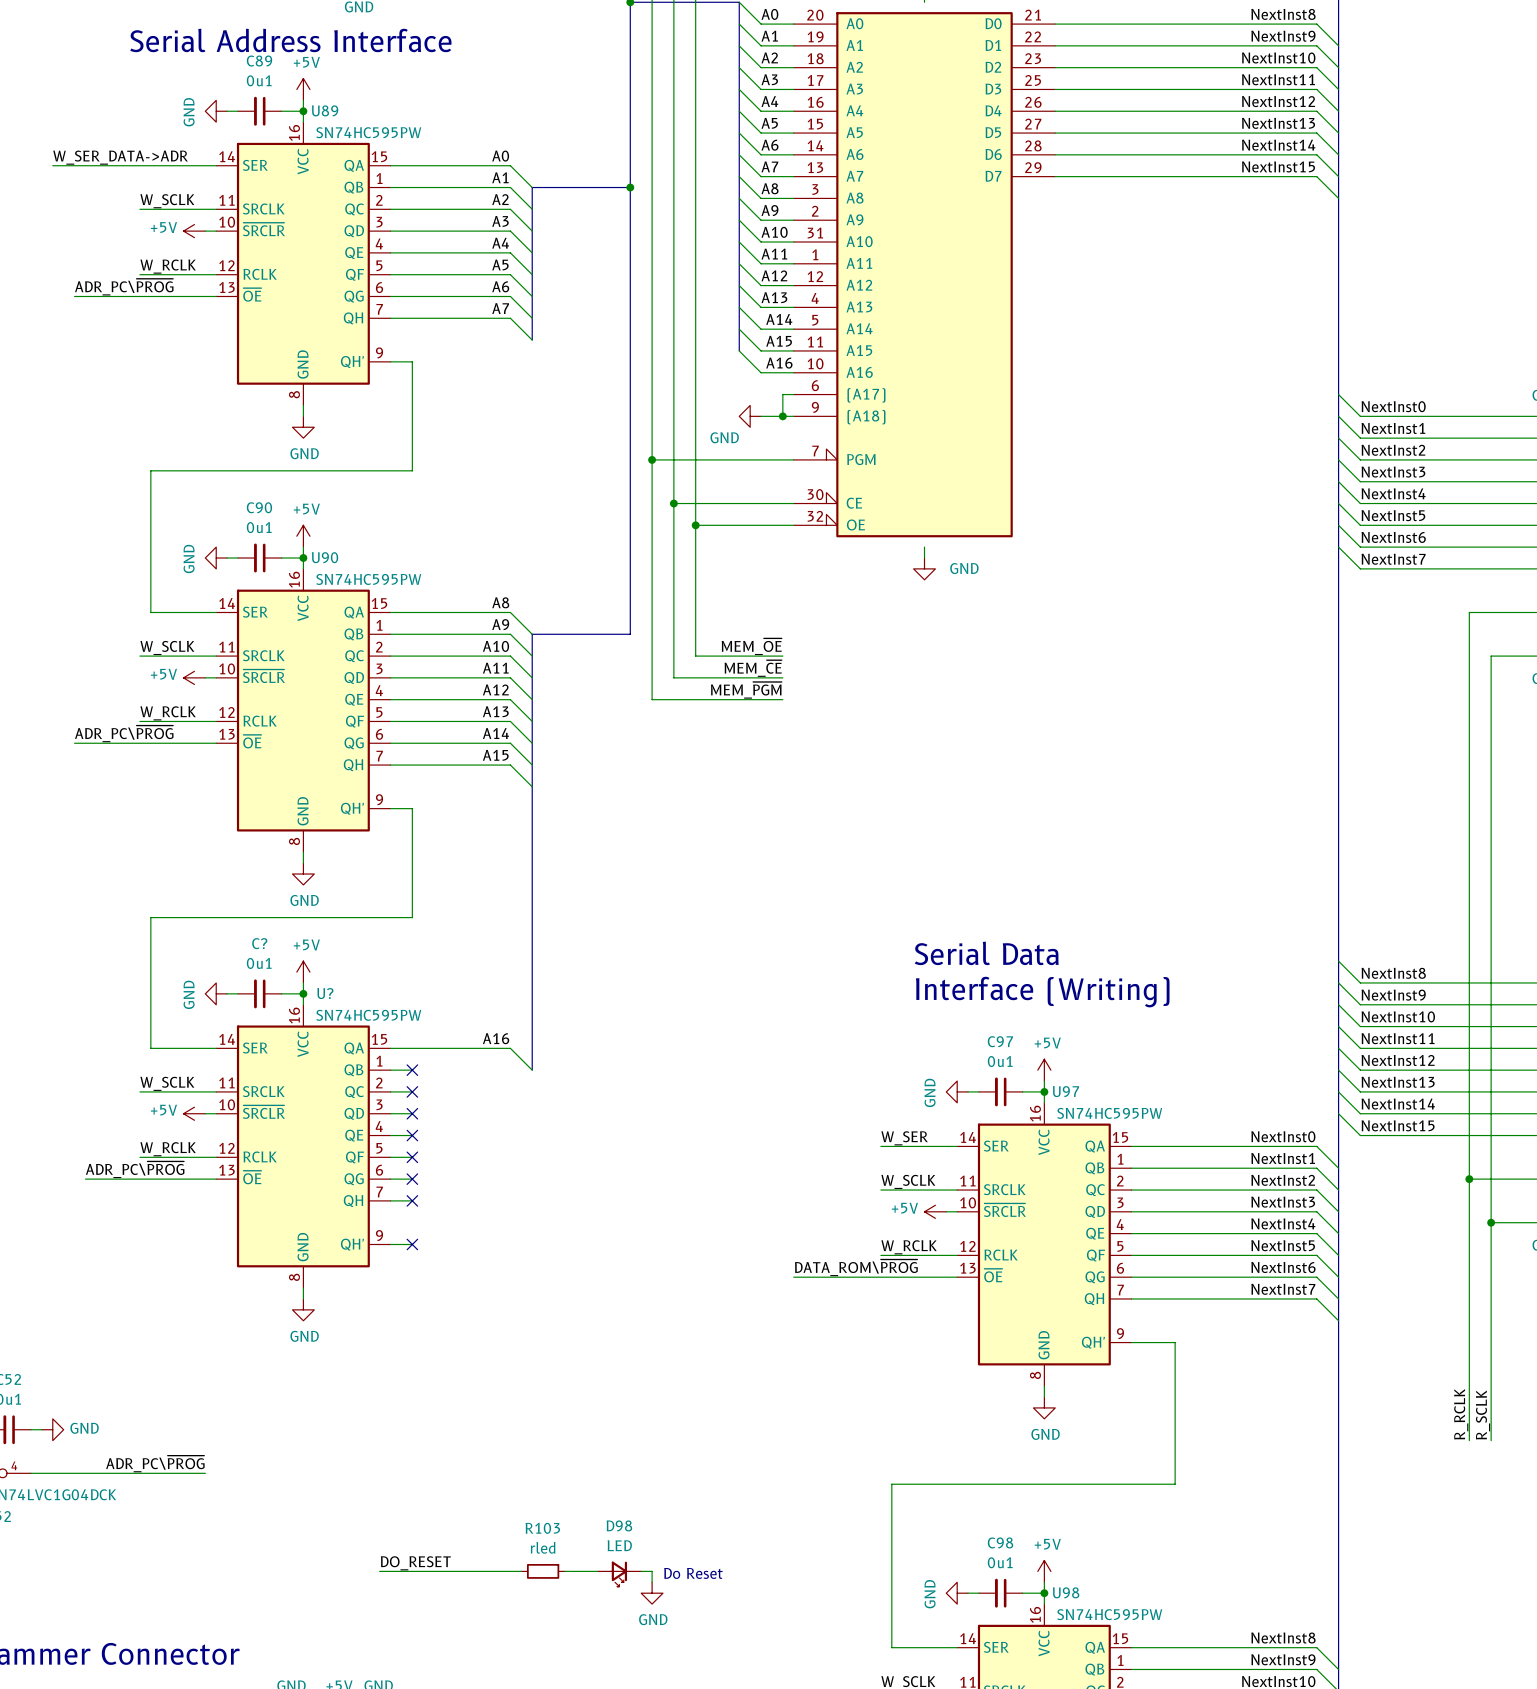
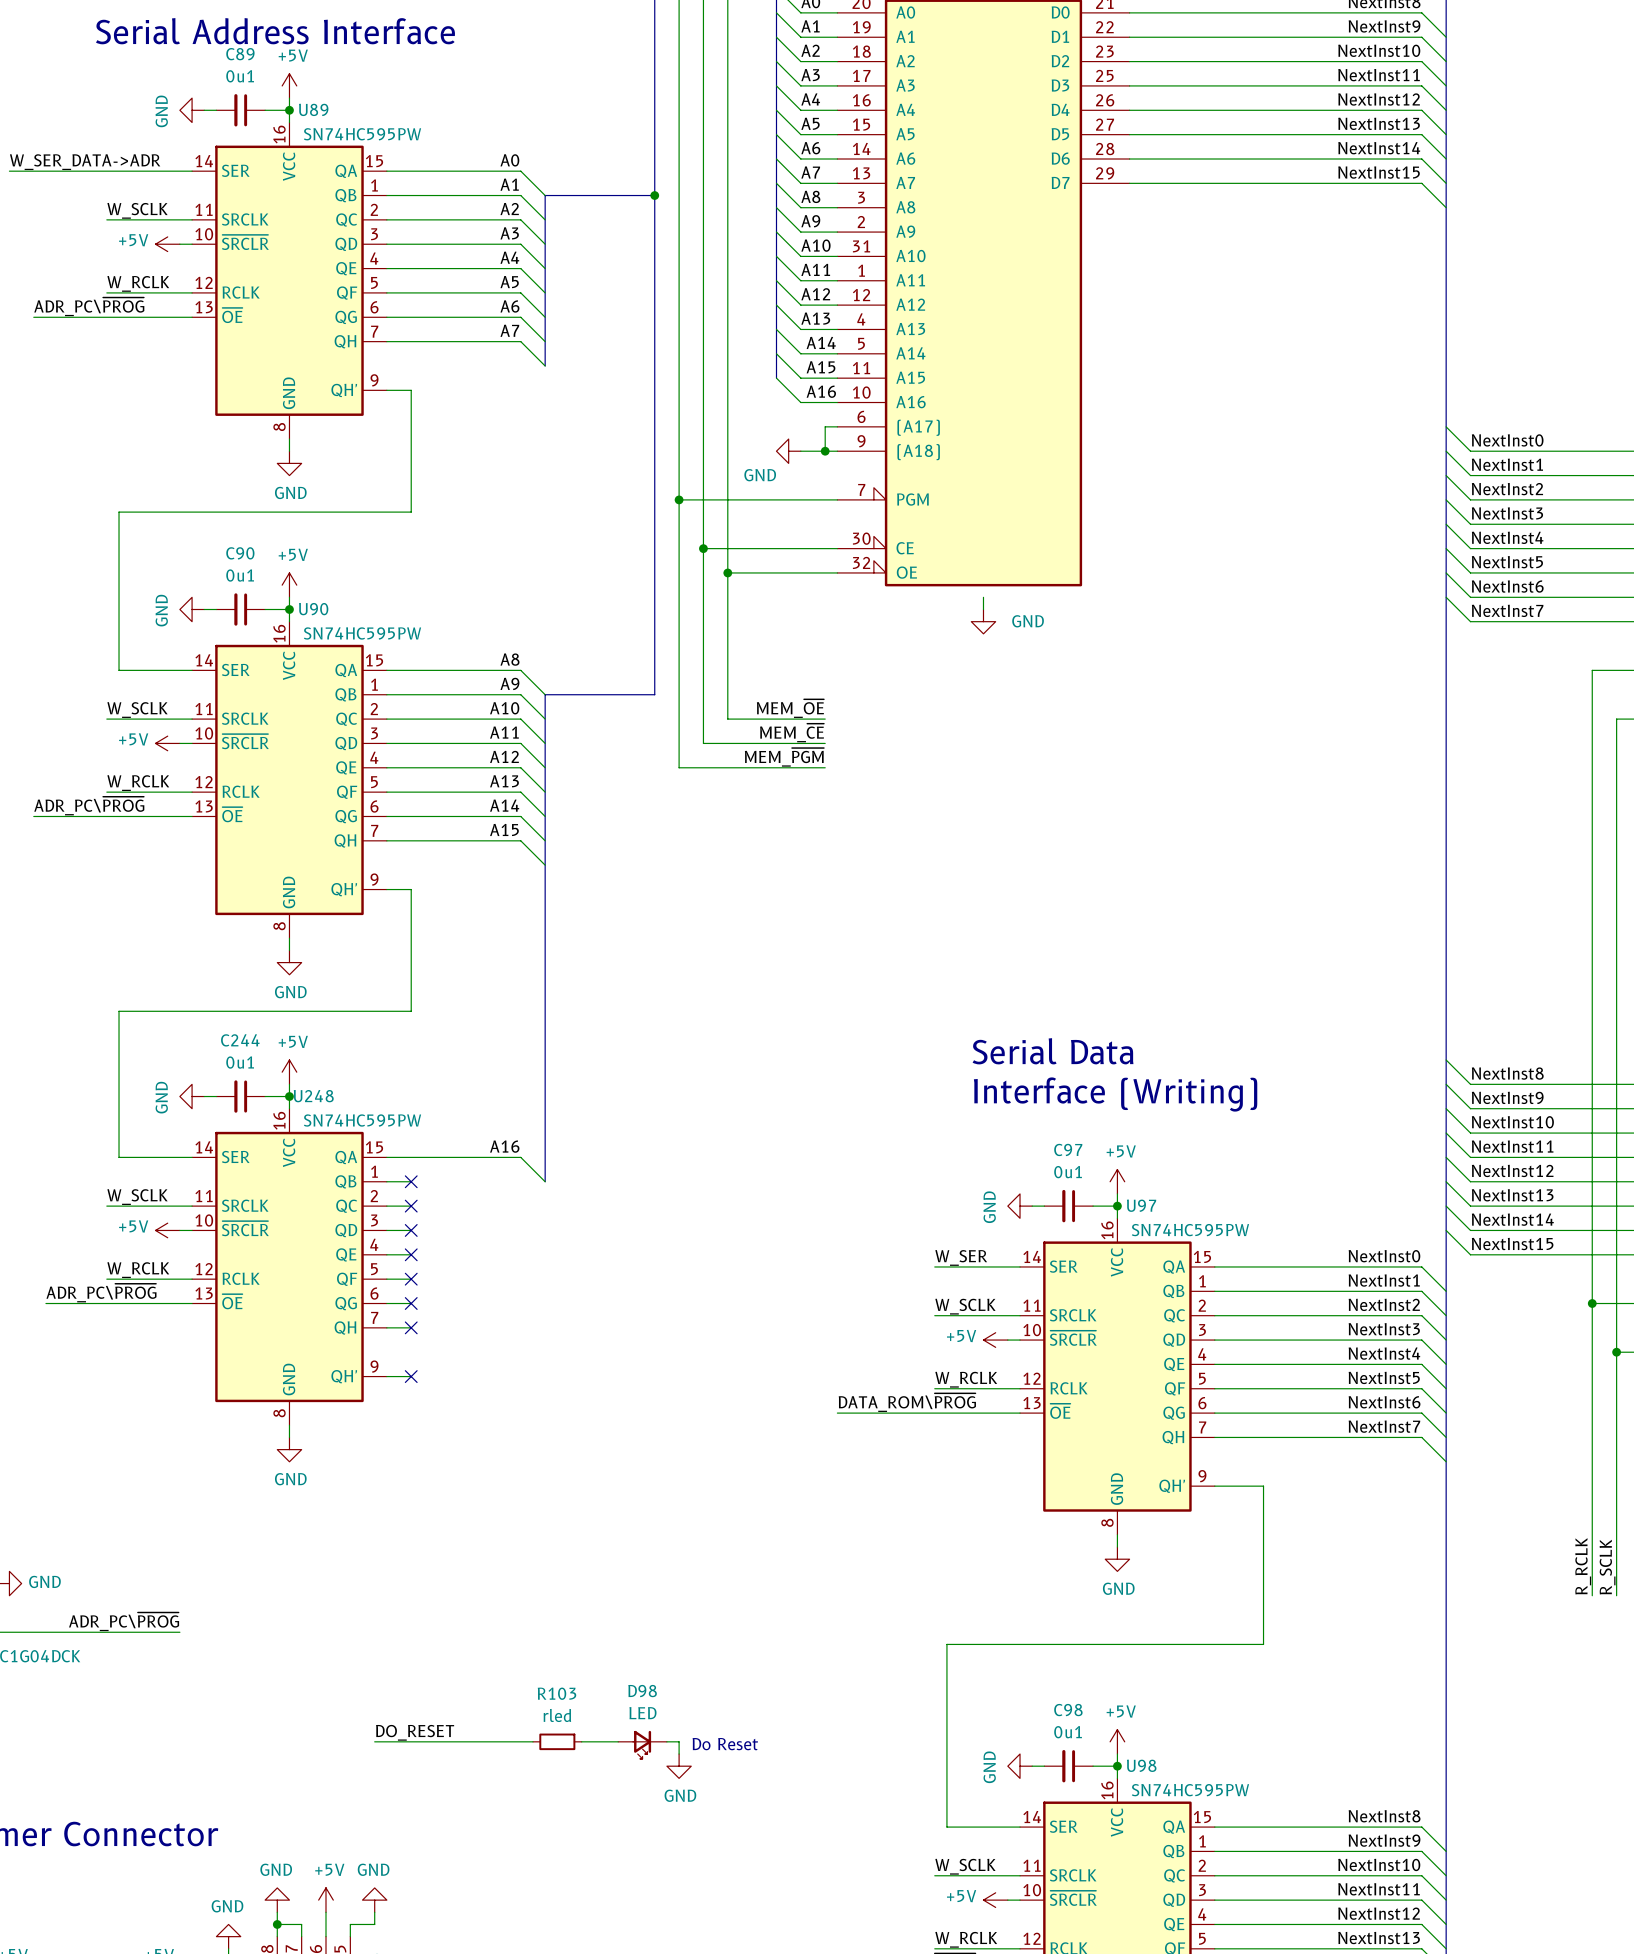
C? name: C? (259, 943) -> C244 (240, 1040)
U? name: U? (325, 993) -> U248 (313, 1096)

